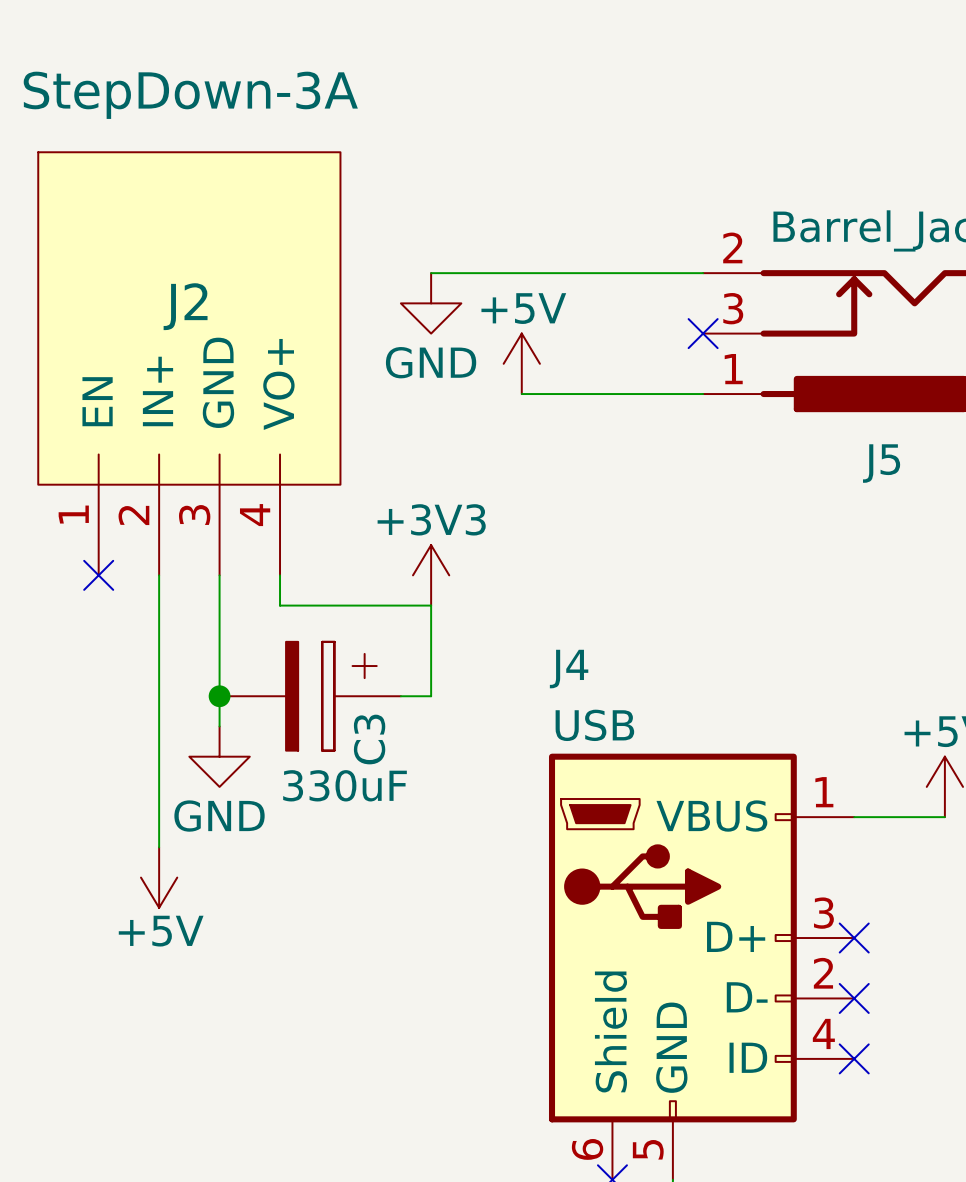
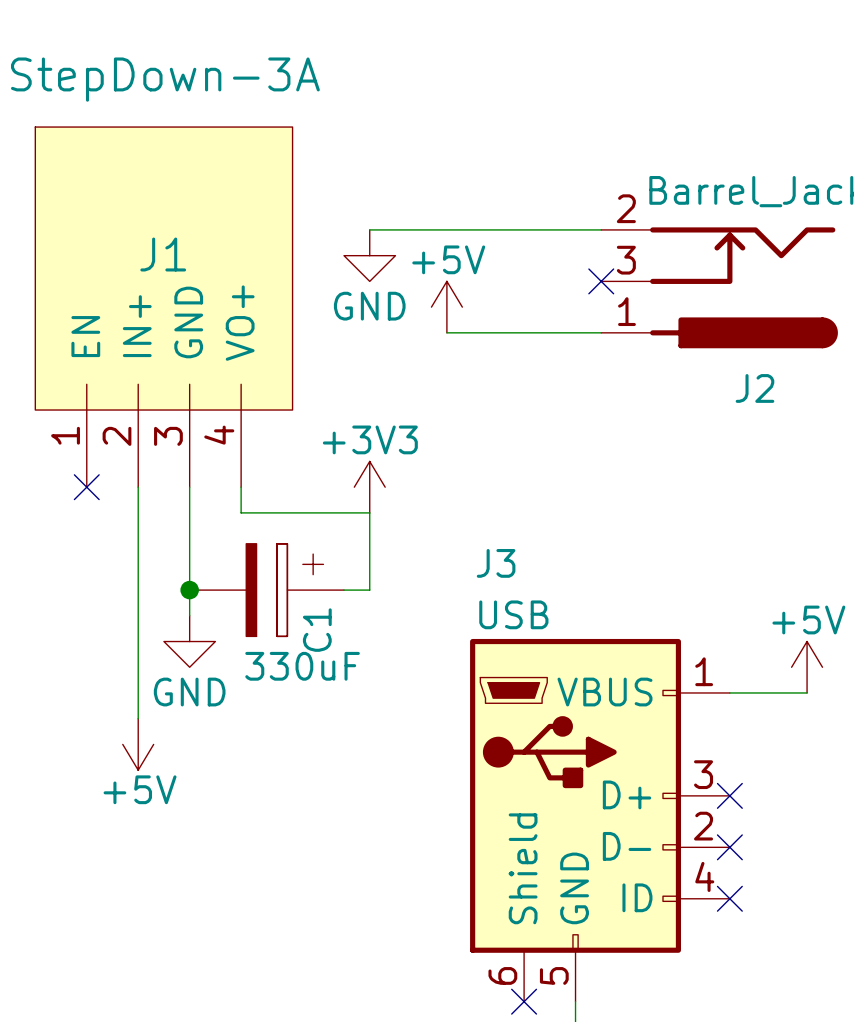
J2 name: J2 (185, 306) -> J1 (163, 254)
J5 name: J5 (881, 463) -> J2 (754, 388)
J4 name: J4 (569, 669) -> J3 (496, 563)
C3 name: C3 (369, 739) -> C1 (317, 630)

